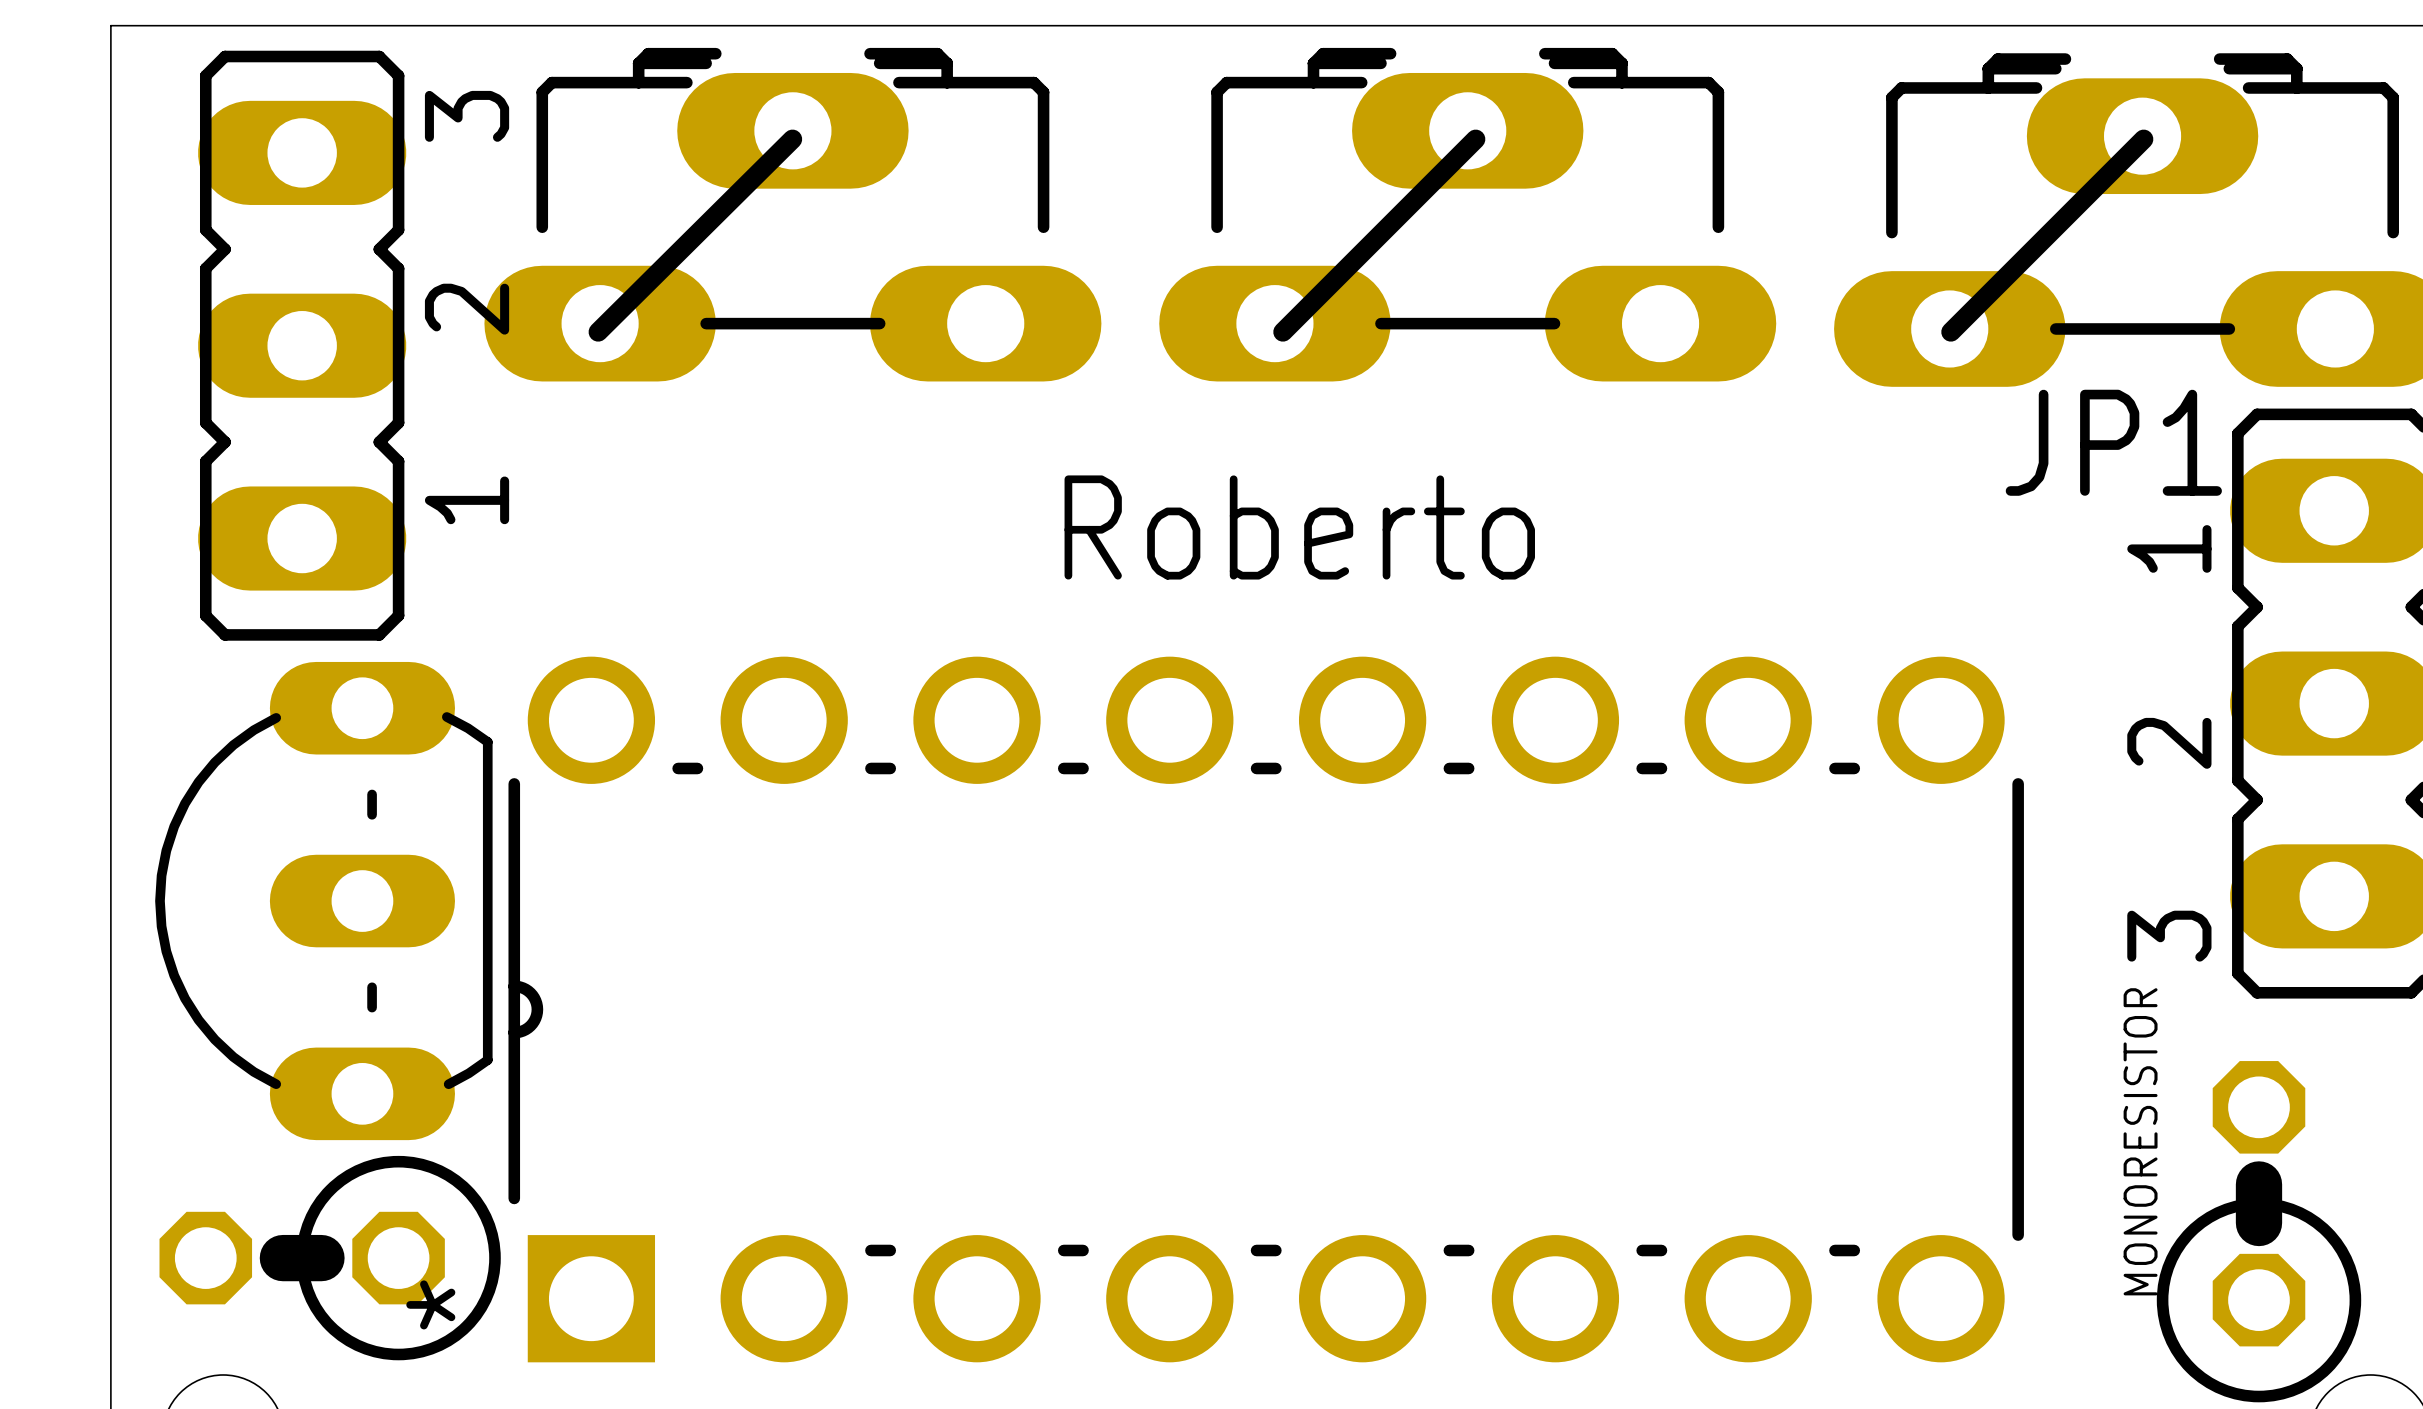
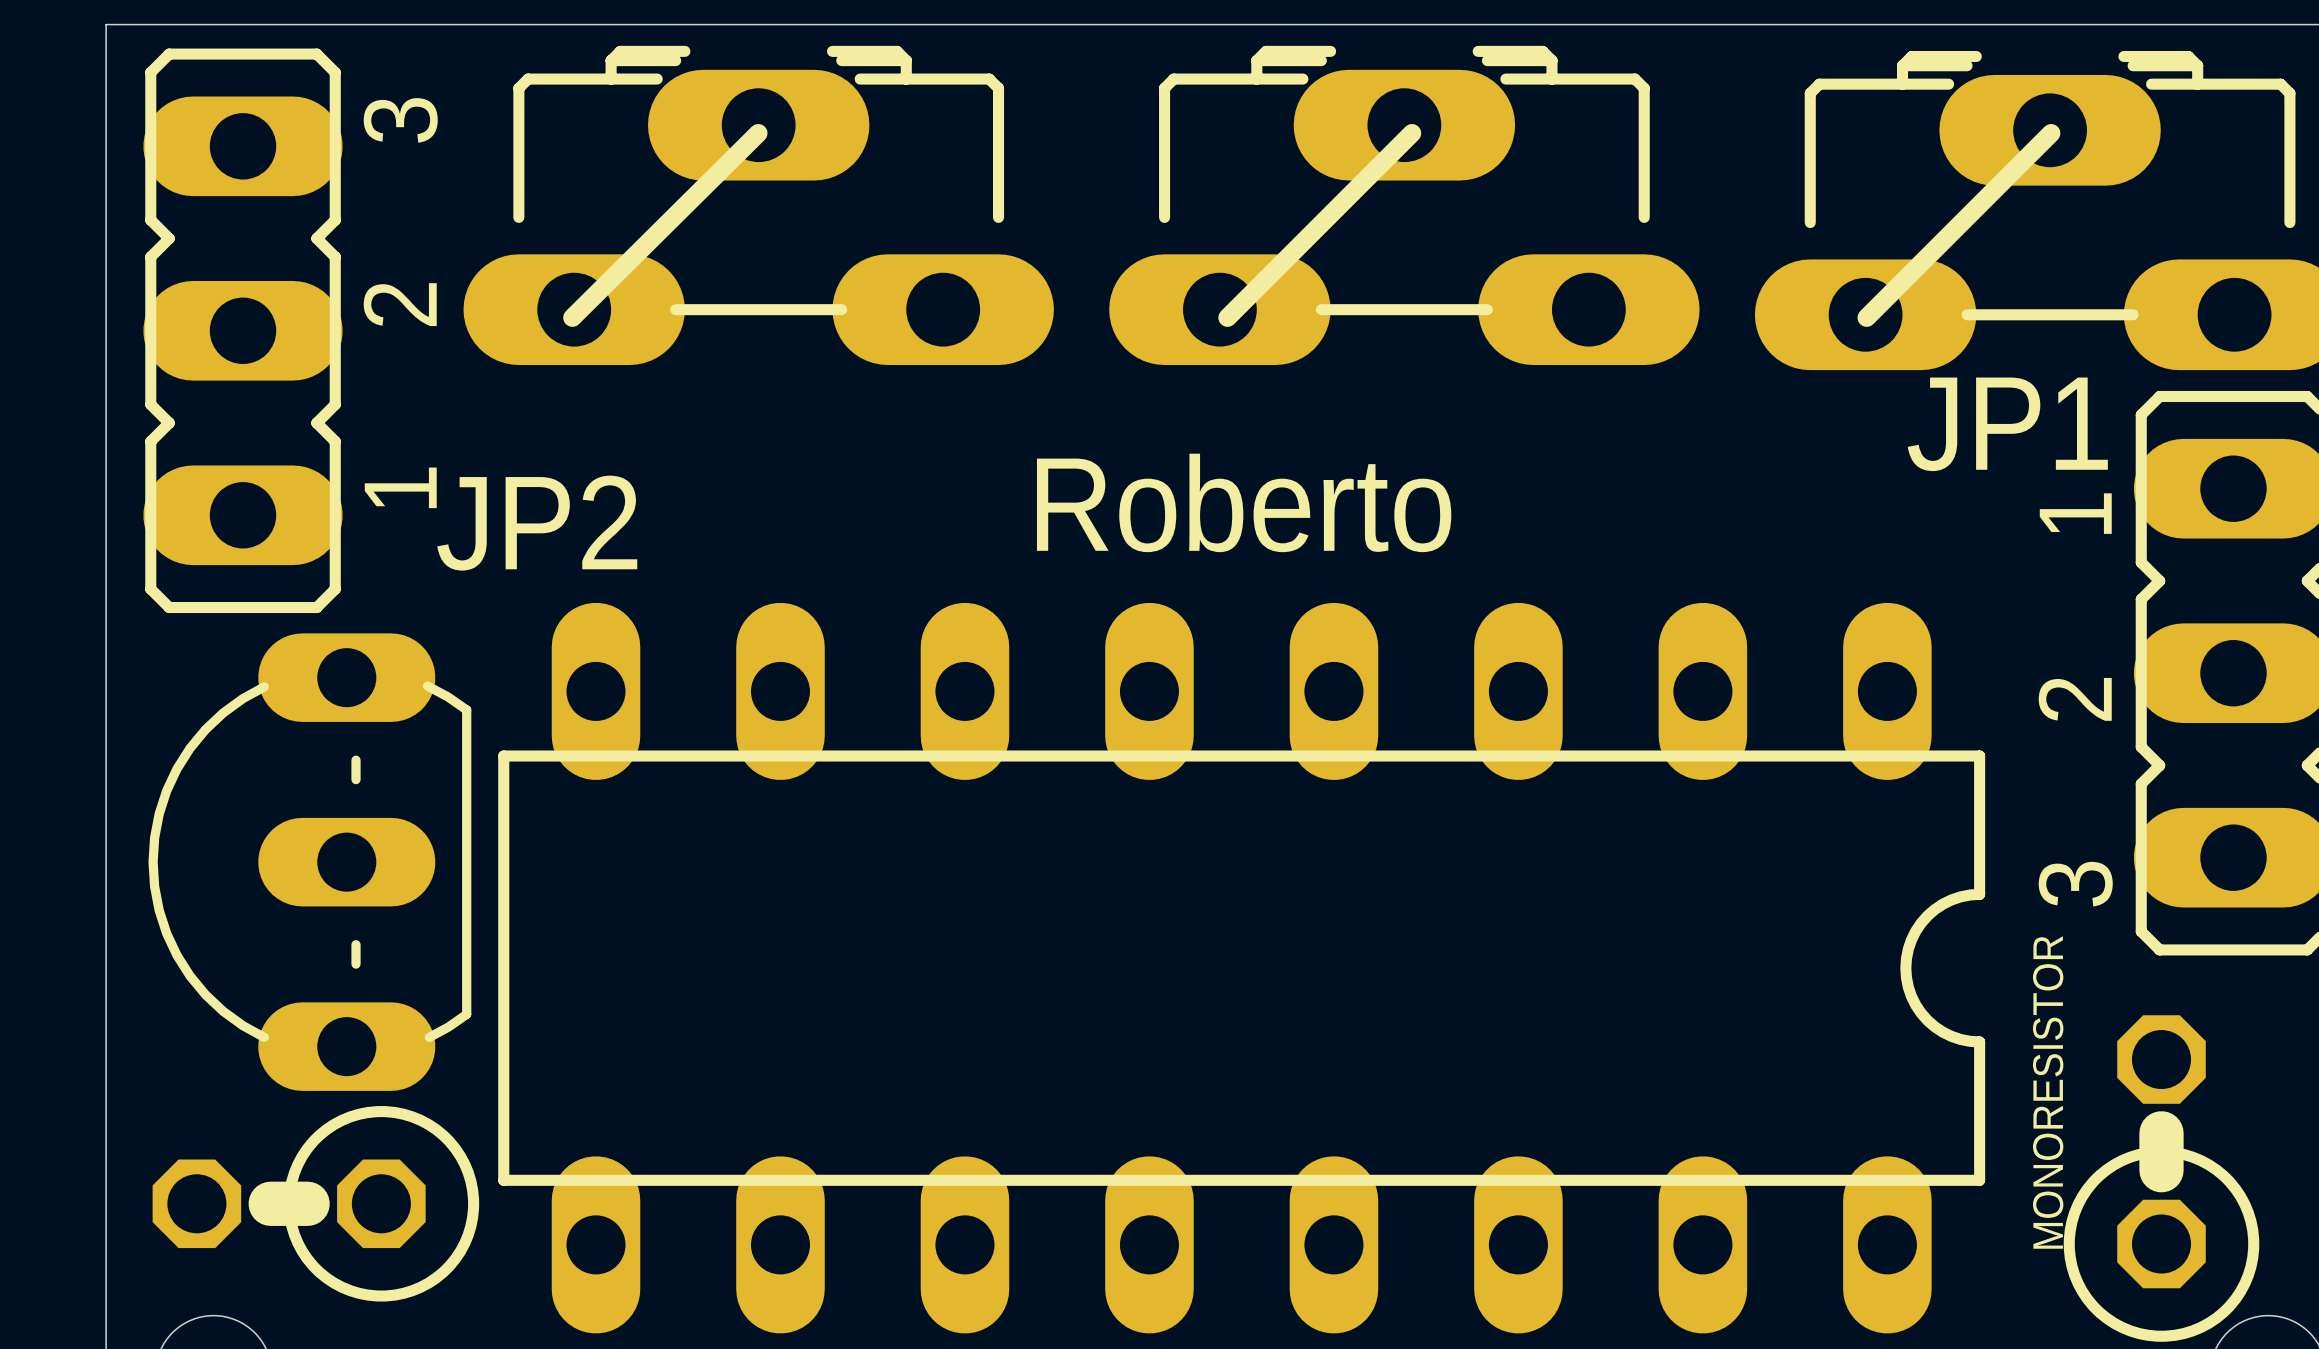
JP2 position: (302, 345) -> (243, 330)
JP2 name: none -> JP2 (537, 523)
part footprint: [508, 656, 2024, 1363] -> [498, 602, 1986, 1334]

